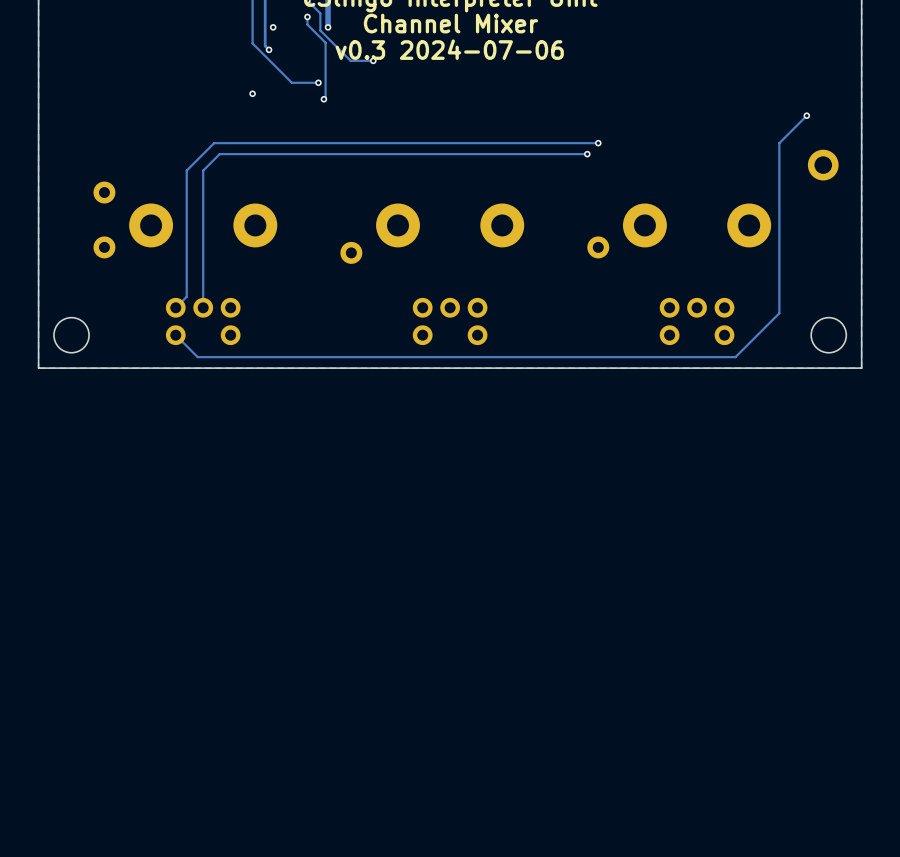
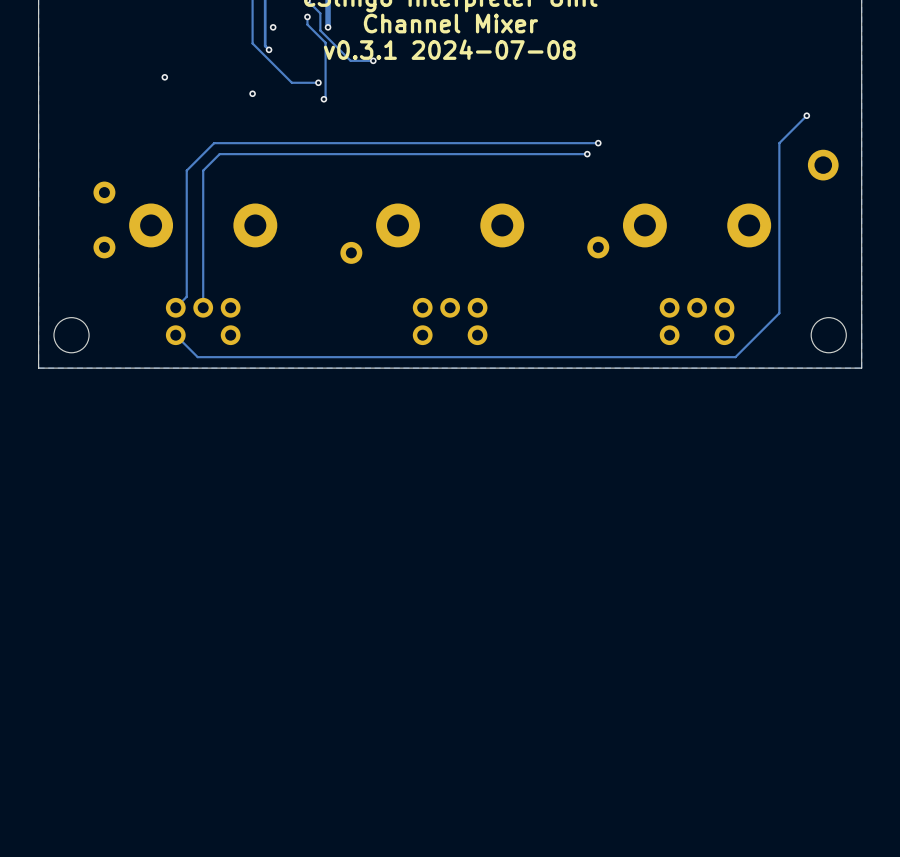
text: v0.3 2024-07-06 (449, 49) -> v0.3.1 2024-07-08 (449, 49)
via: none -> (164, 77)

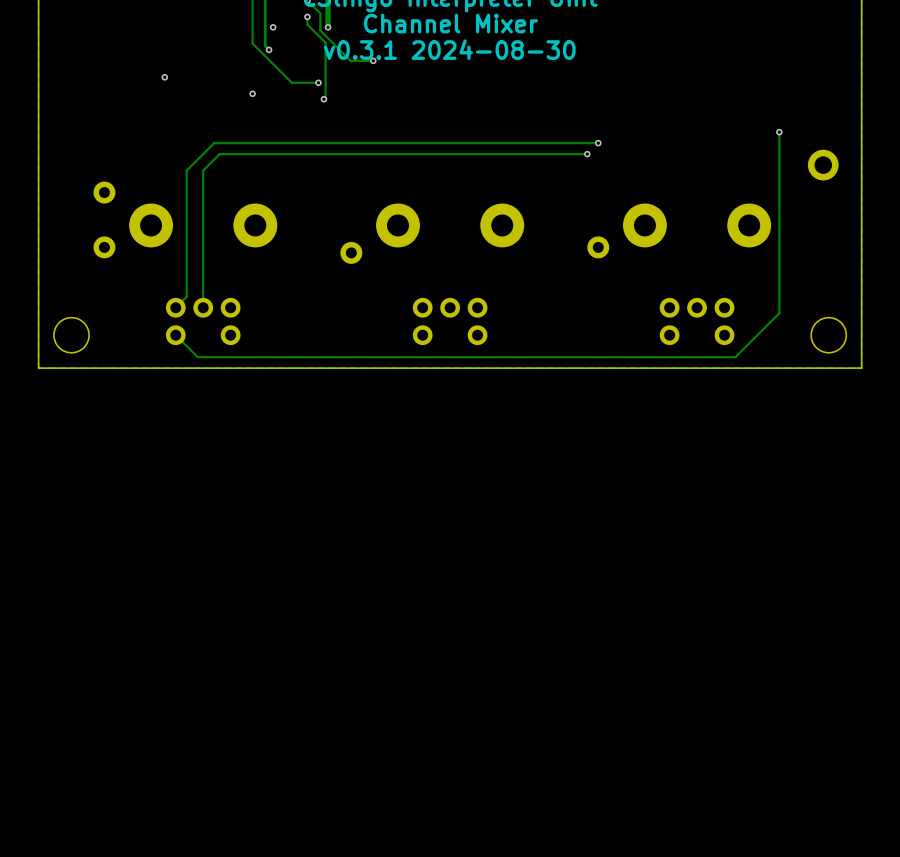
text: v0.3.1 2024-07-08 (449, 49) -> v0.3.1 2024-08-30 (449, 49)
track: (806, 115) (779, 143) -> (779, 132) (779, 143)
via position: (806, 115) -> (779, 132)

